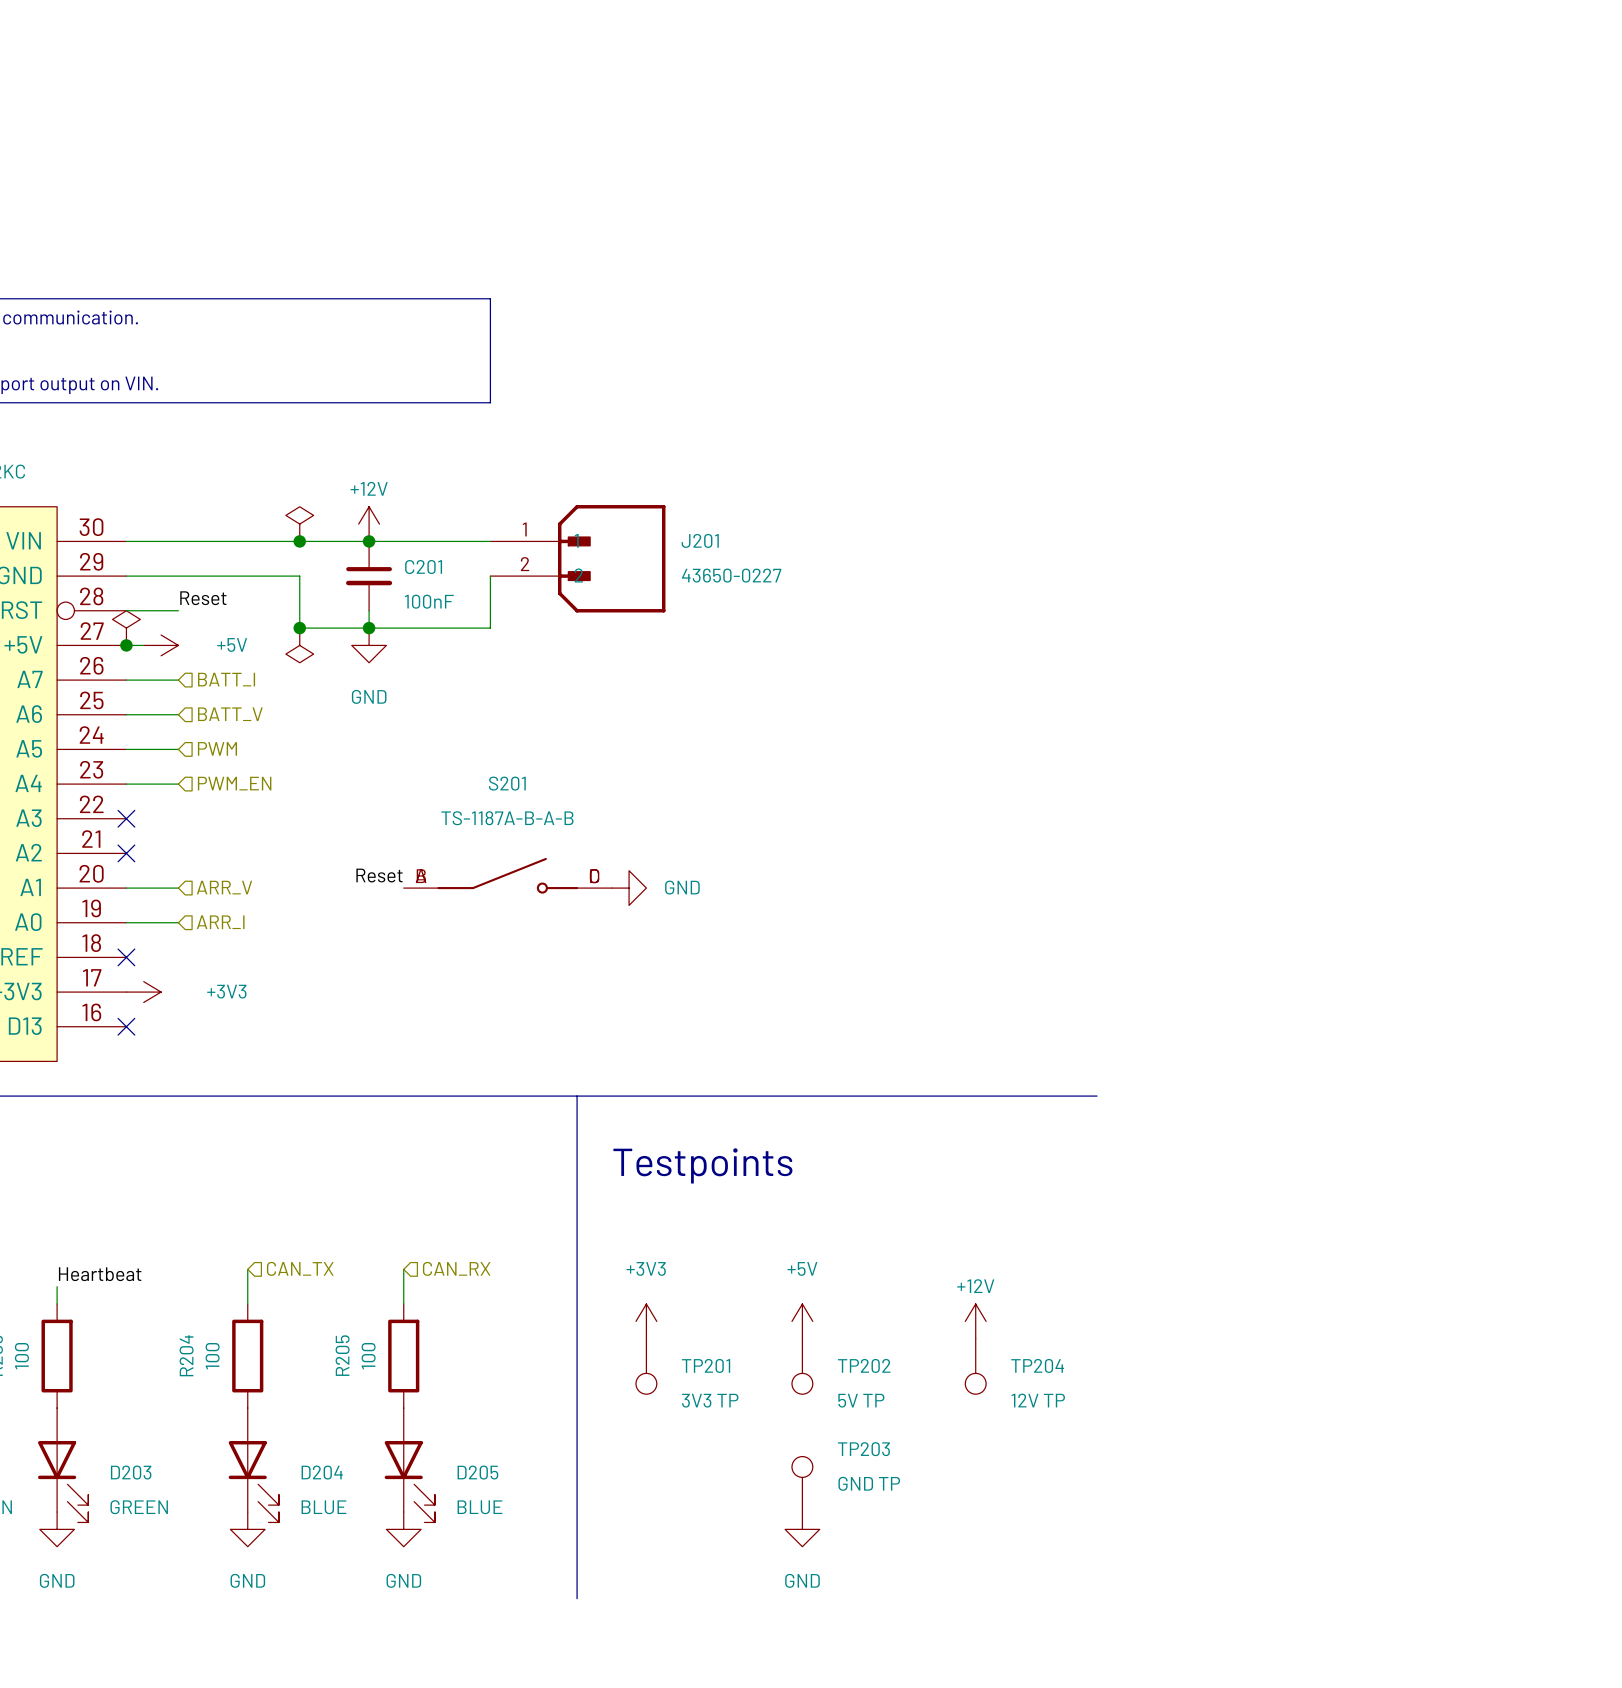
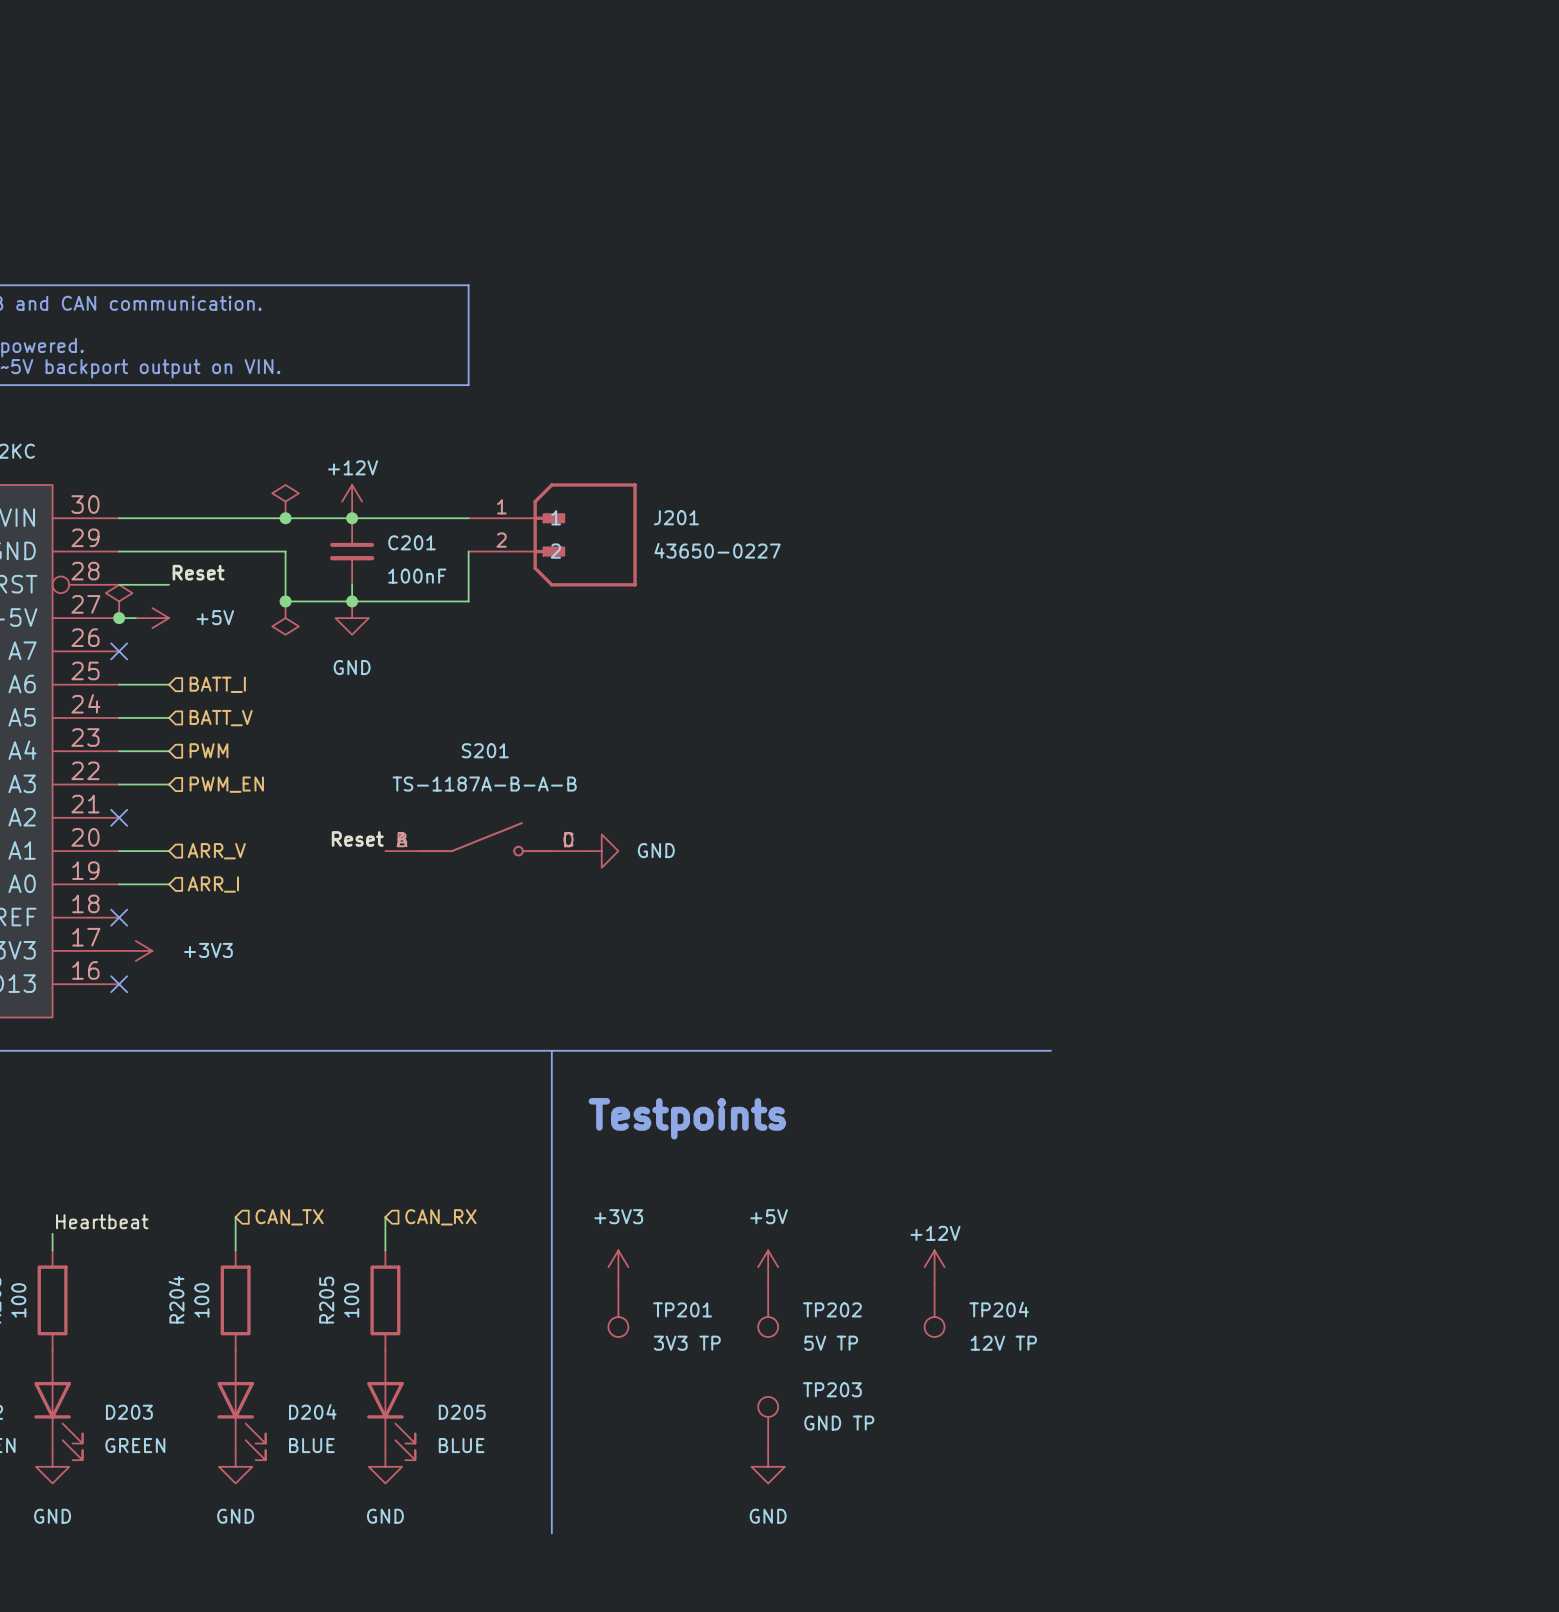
hierarchical label: BATT_I (226, 679) -> none
wire: (126, 680) (178, 680) -> (119, 784) (169, 784)
no-connect mark: none -> (119, 651)
hierarchical label: BATT_V (230, 714) -> BATT_I (217, 684)
hierarchical label: PWM (217, 748) -> BATT_V (221, 718)
hierarchical label: PWM_EN (234, 783) -> PWM (208, 750)
no-connect mark: (126, 818) -> none
hierarchical label: none -> PWM_EN (226, 784)

